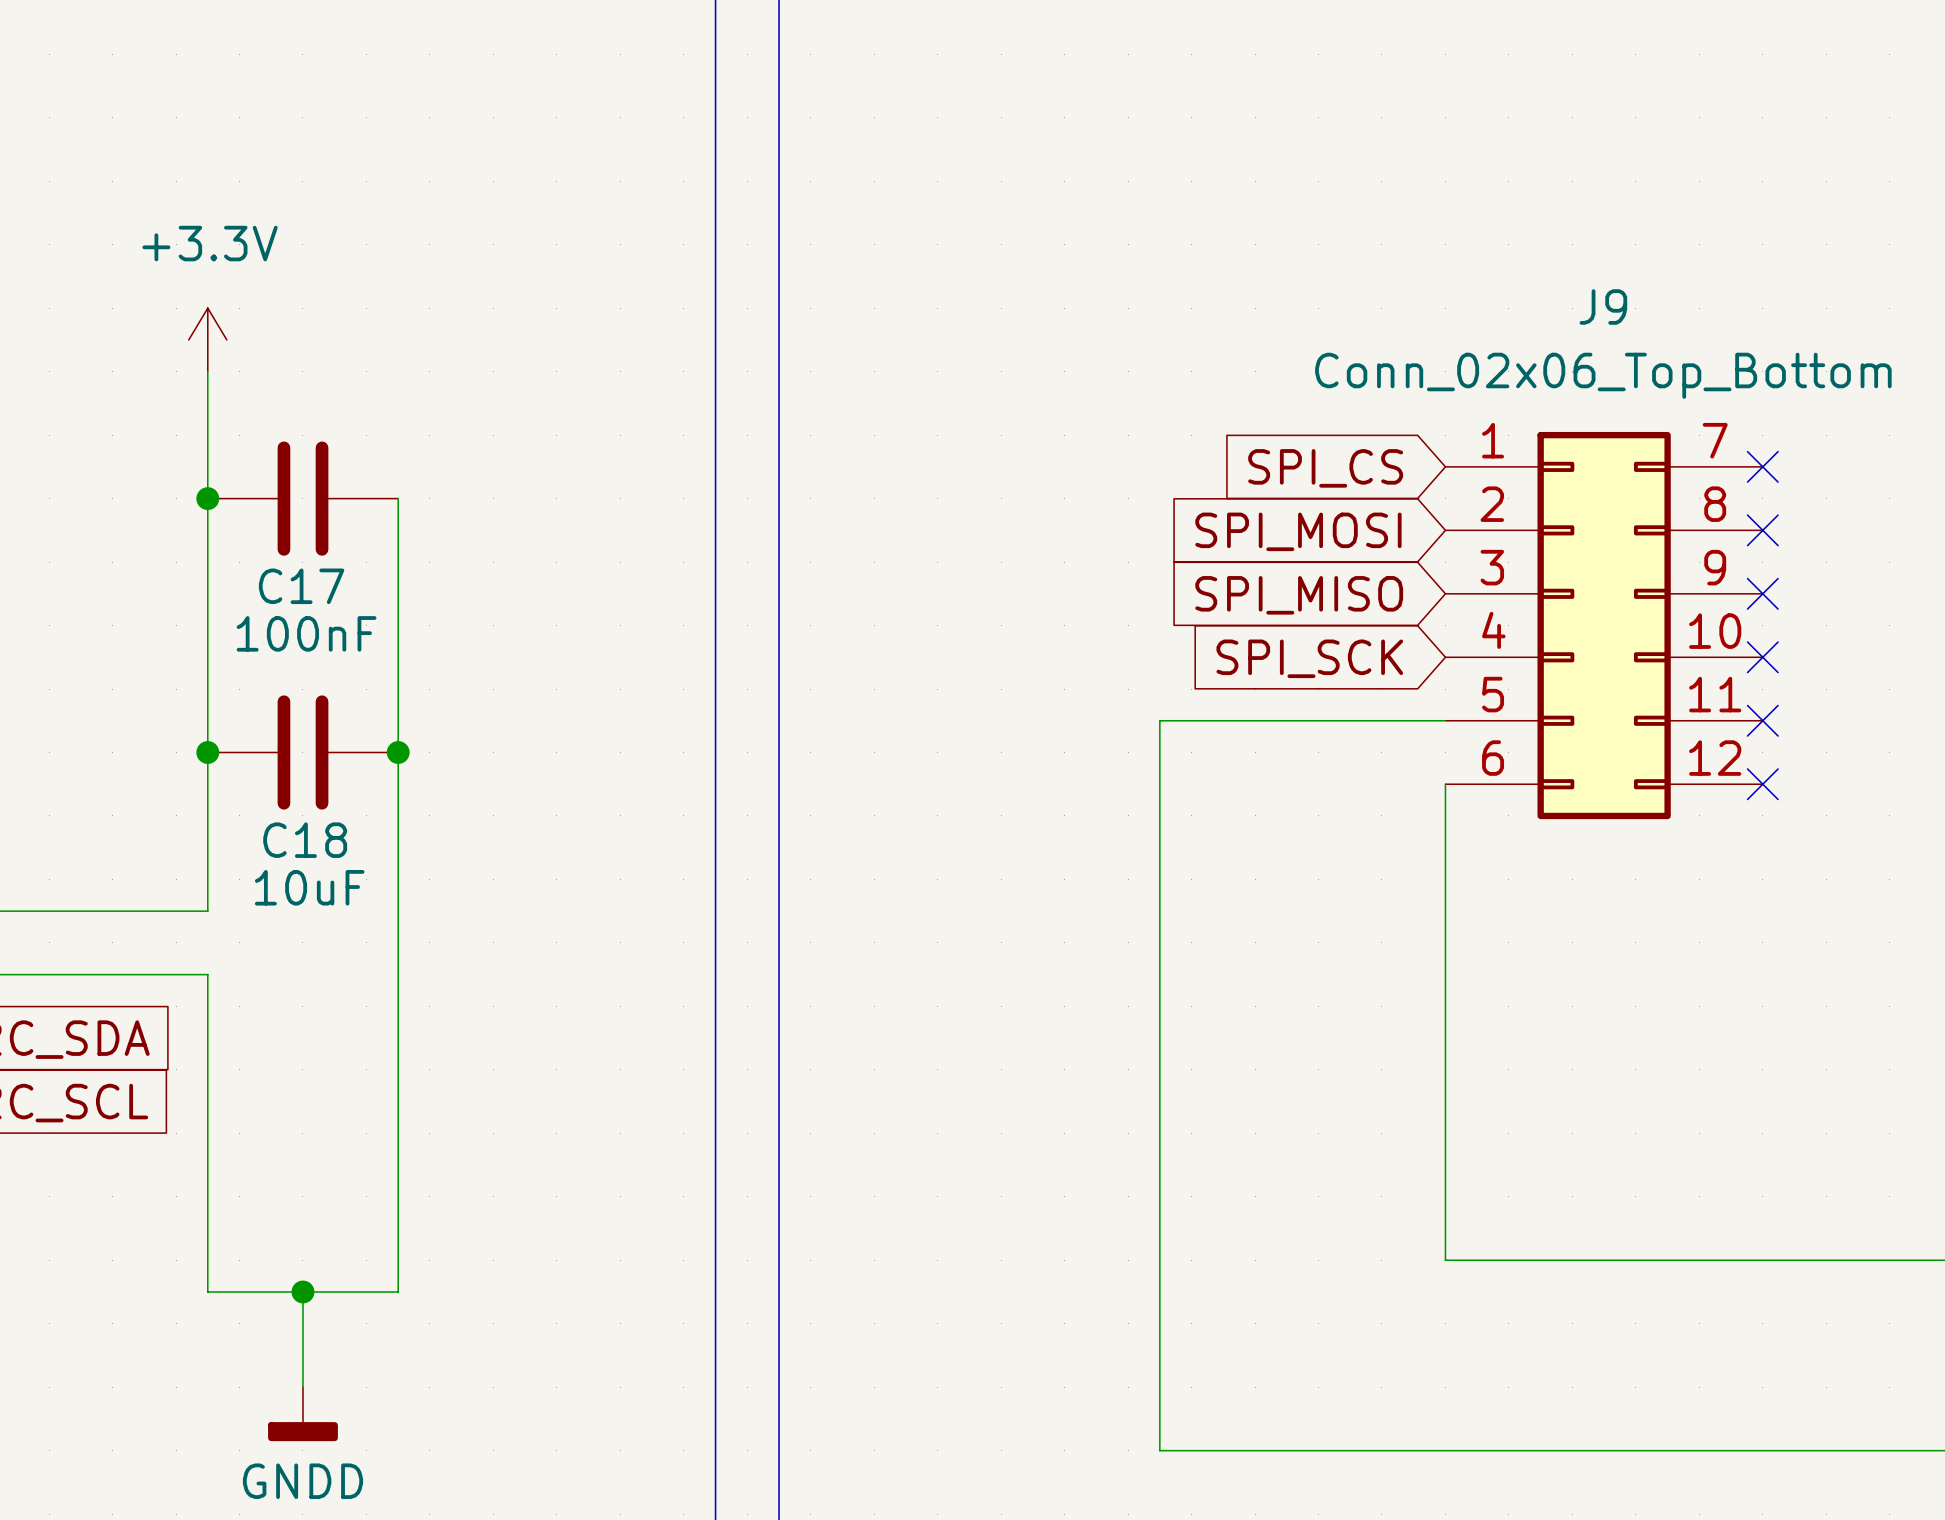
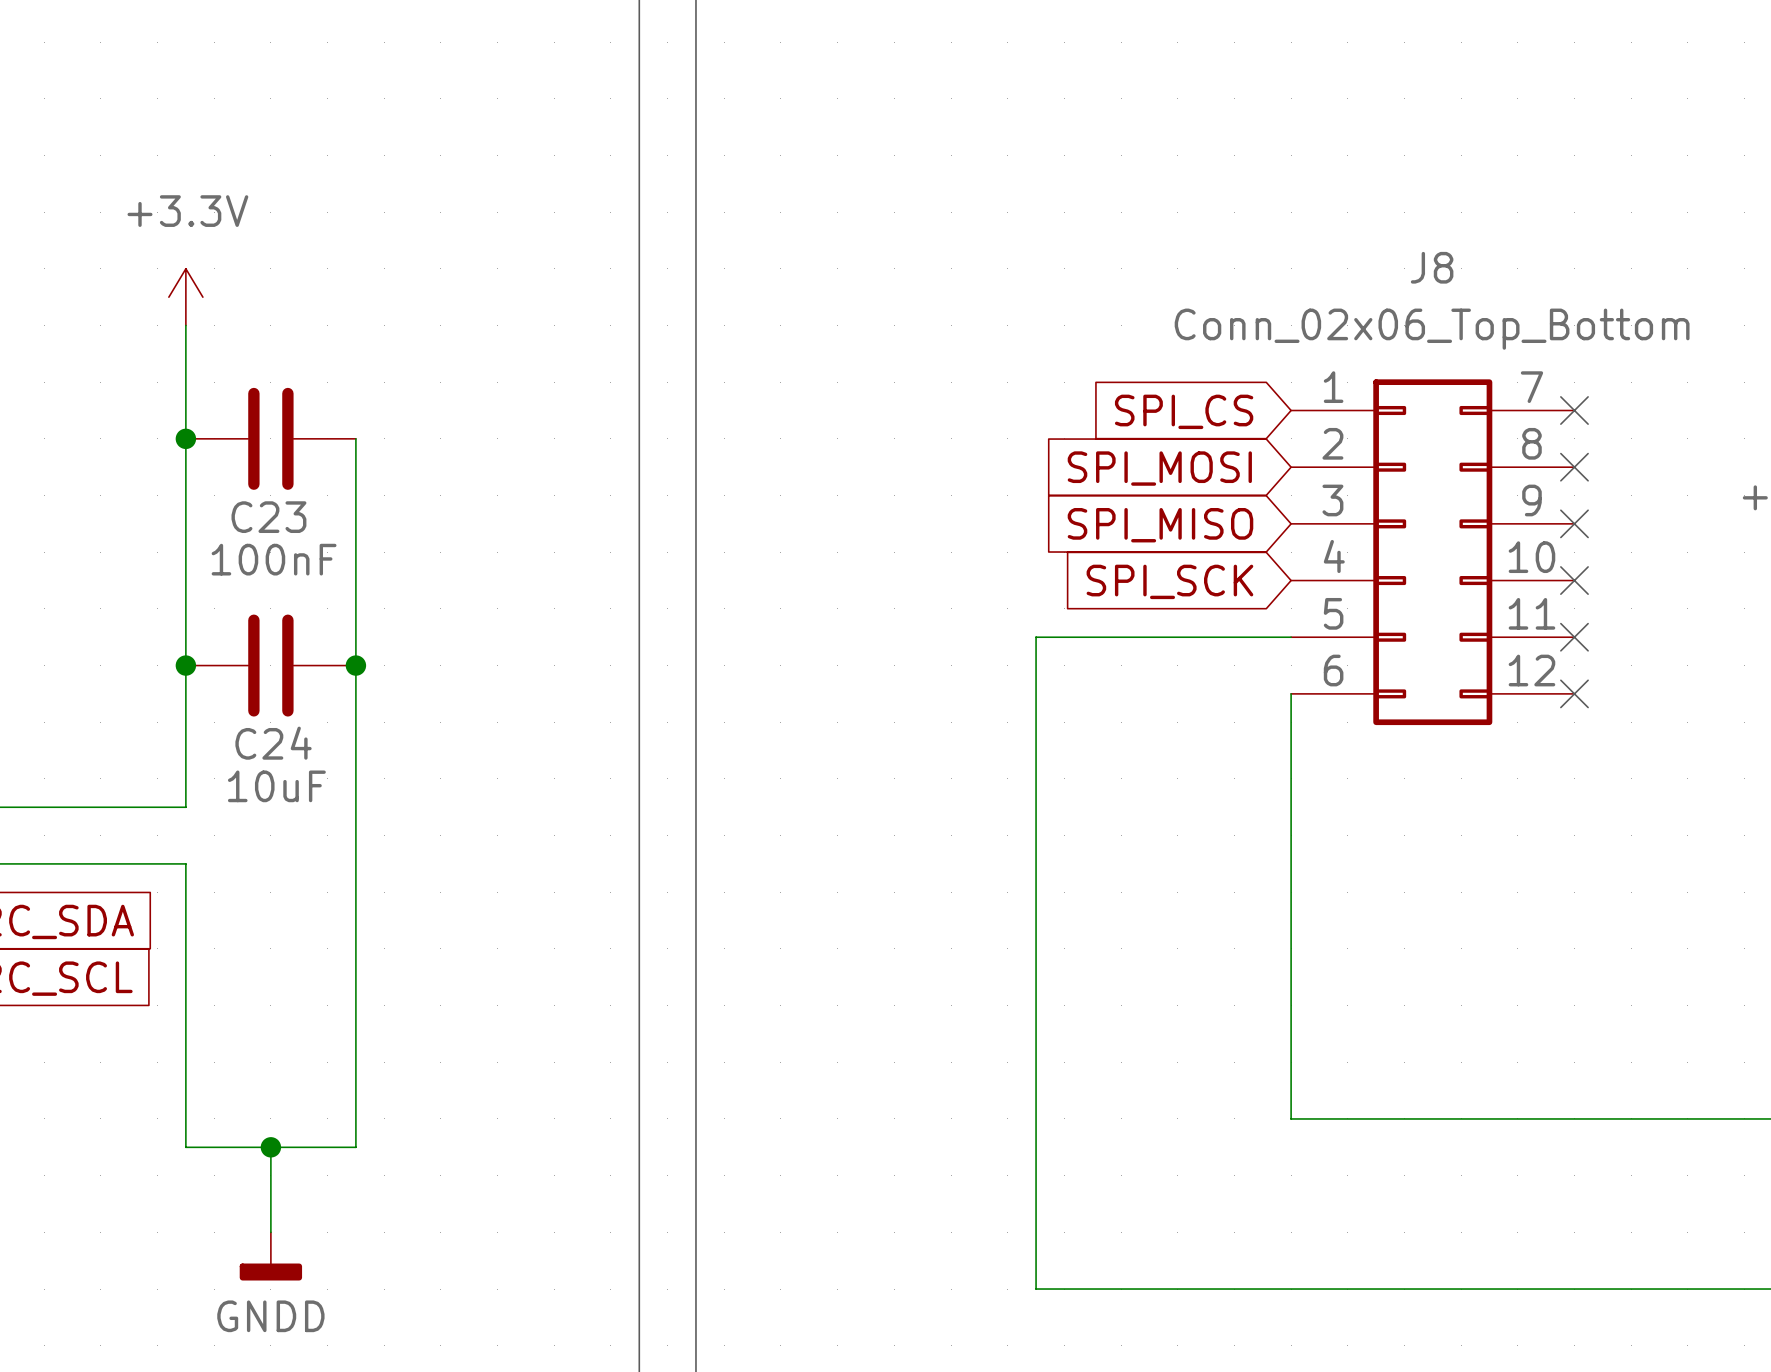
J9 name: J9 (1603, 307) -> J8 (1432, 267)
C17 name: C17 (301, 586) -> C23 (268, 517)
C18 name: C18 (305, 840) -> C24 (273, 743)

